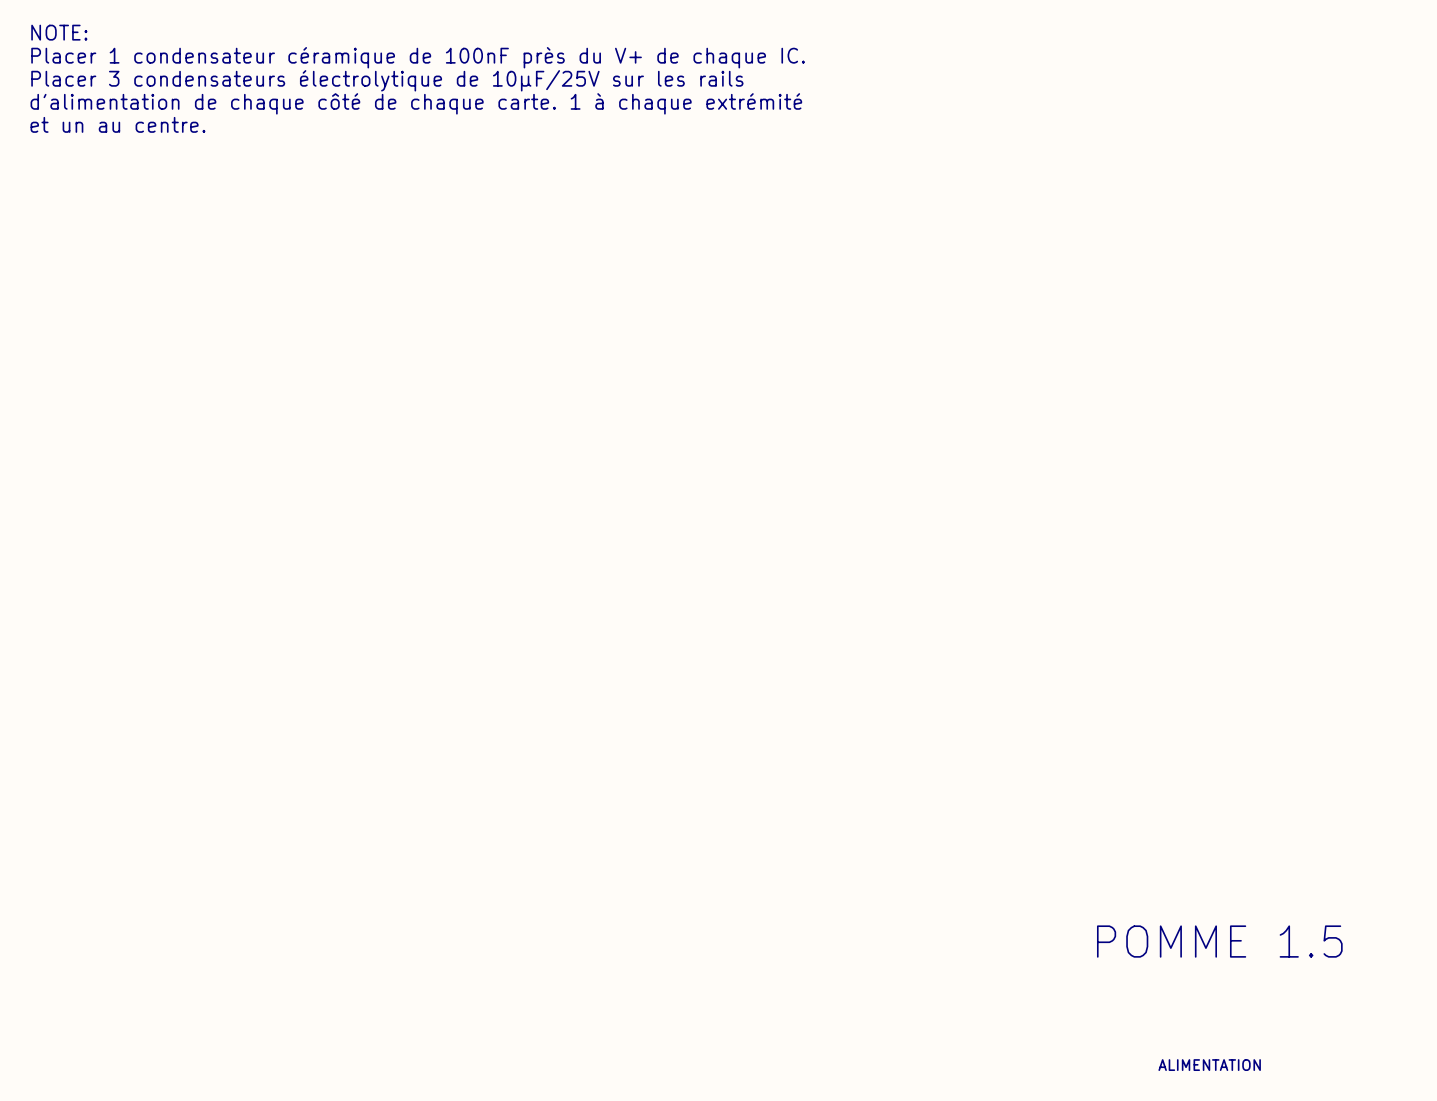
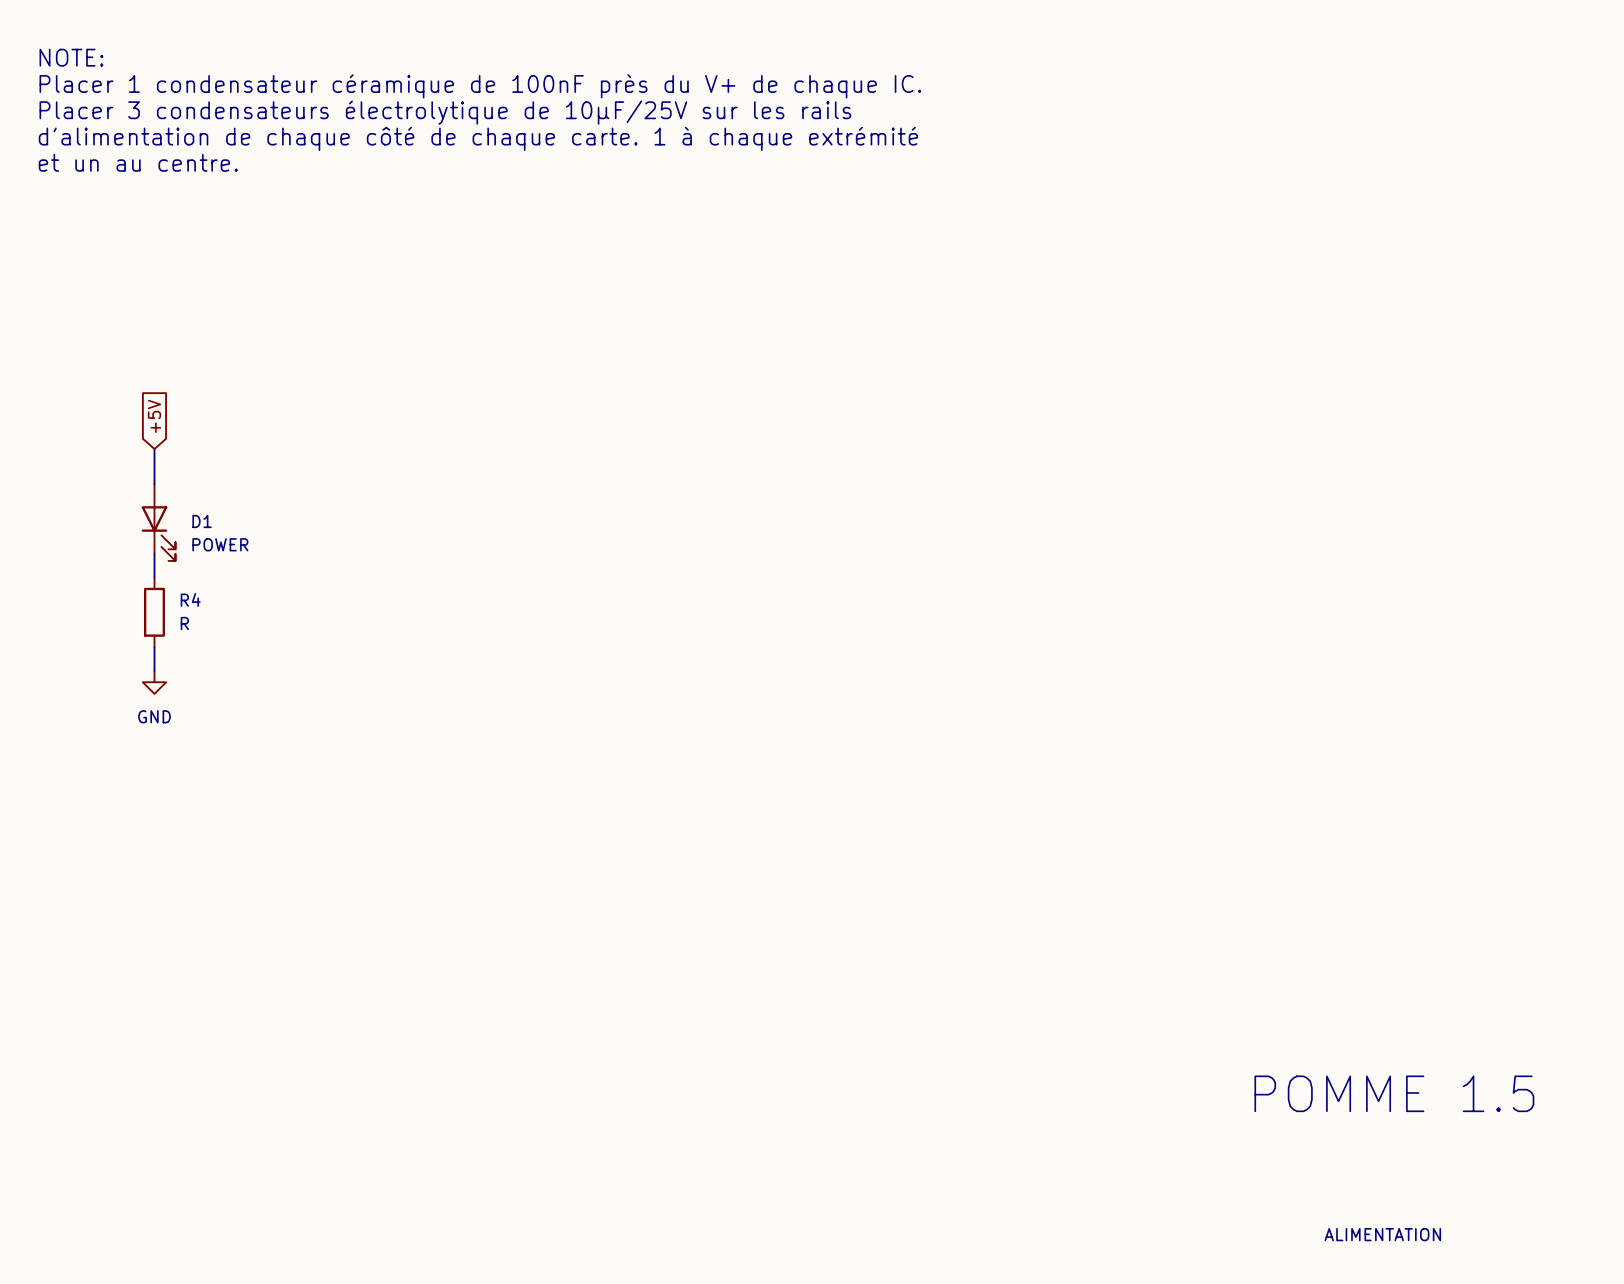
global label: none -> +5V (154, 416)
wire: none -> (154, 449) (154, 484)
D1: none -> POWER (158, 522)
wire: none -> (154, 553) (154, 577)
R4: none -> R (154, 612)
wire: none -> (154, 647) (154, 670)
power symbol: none -> GND (154, 682)

